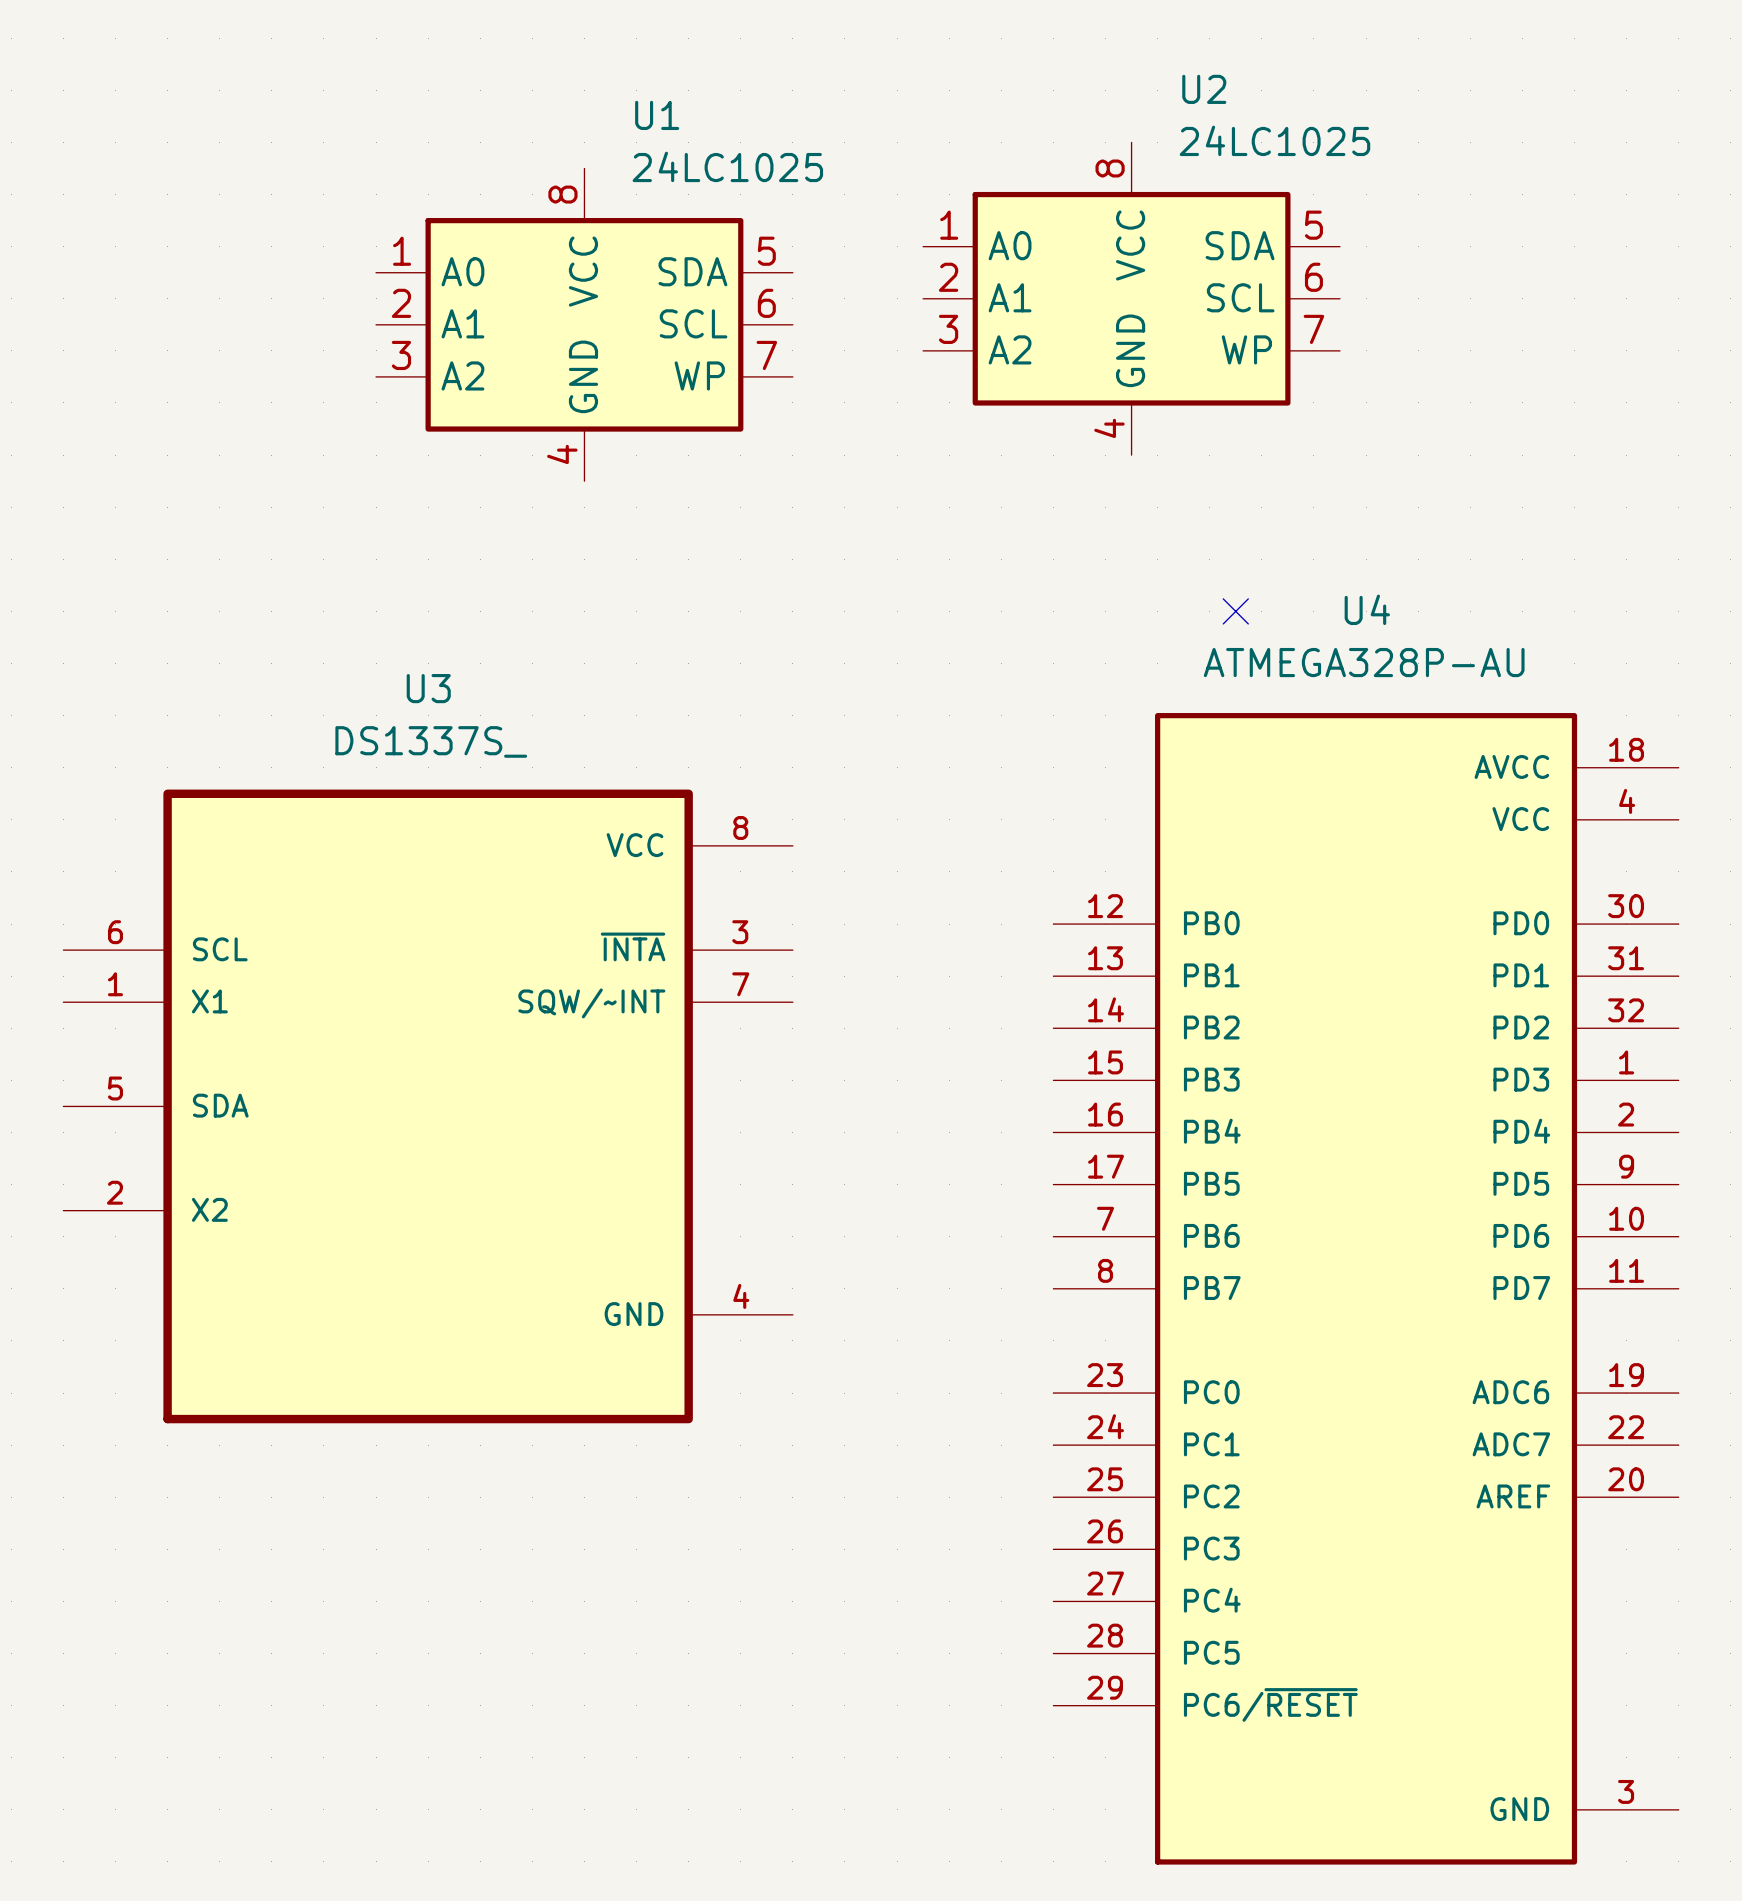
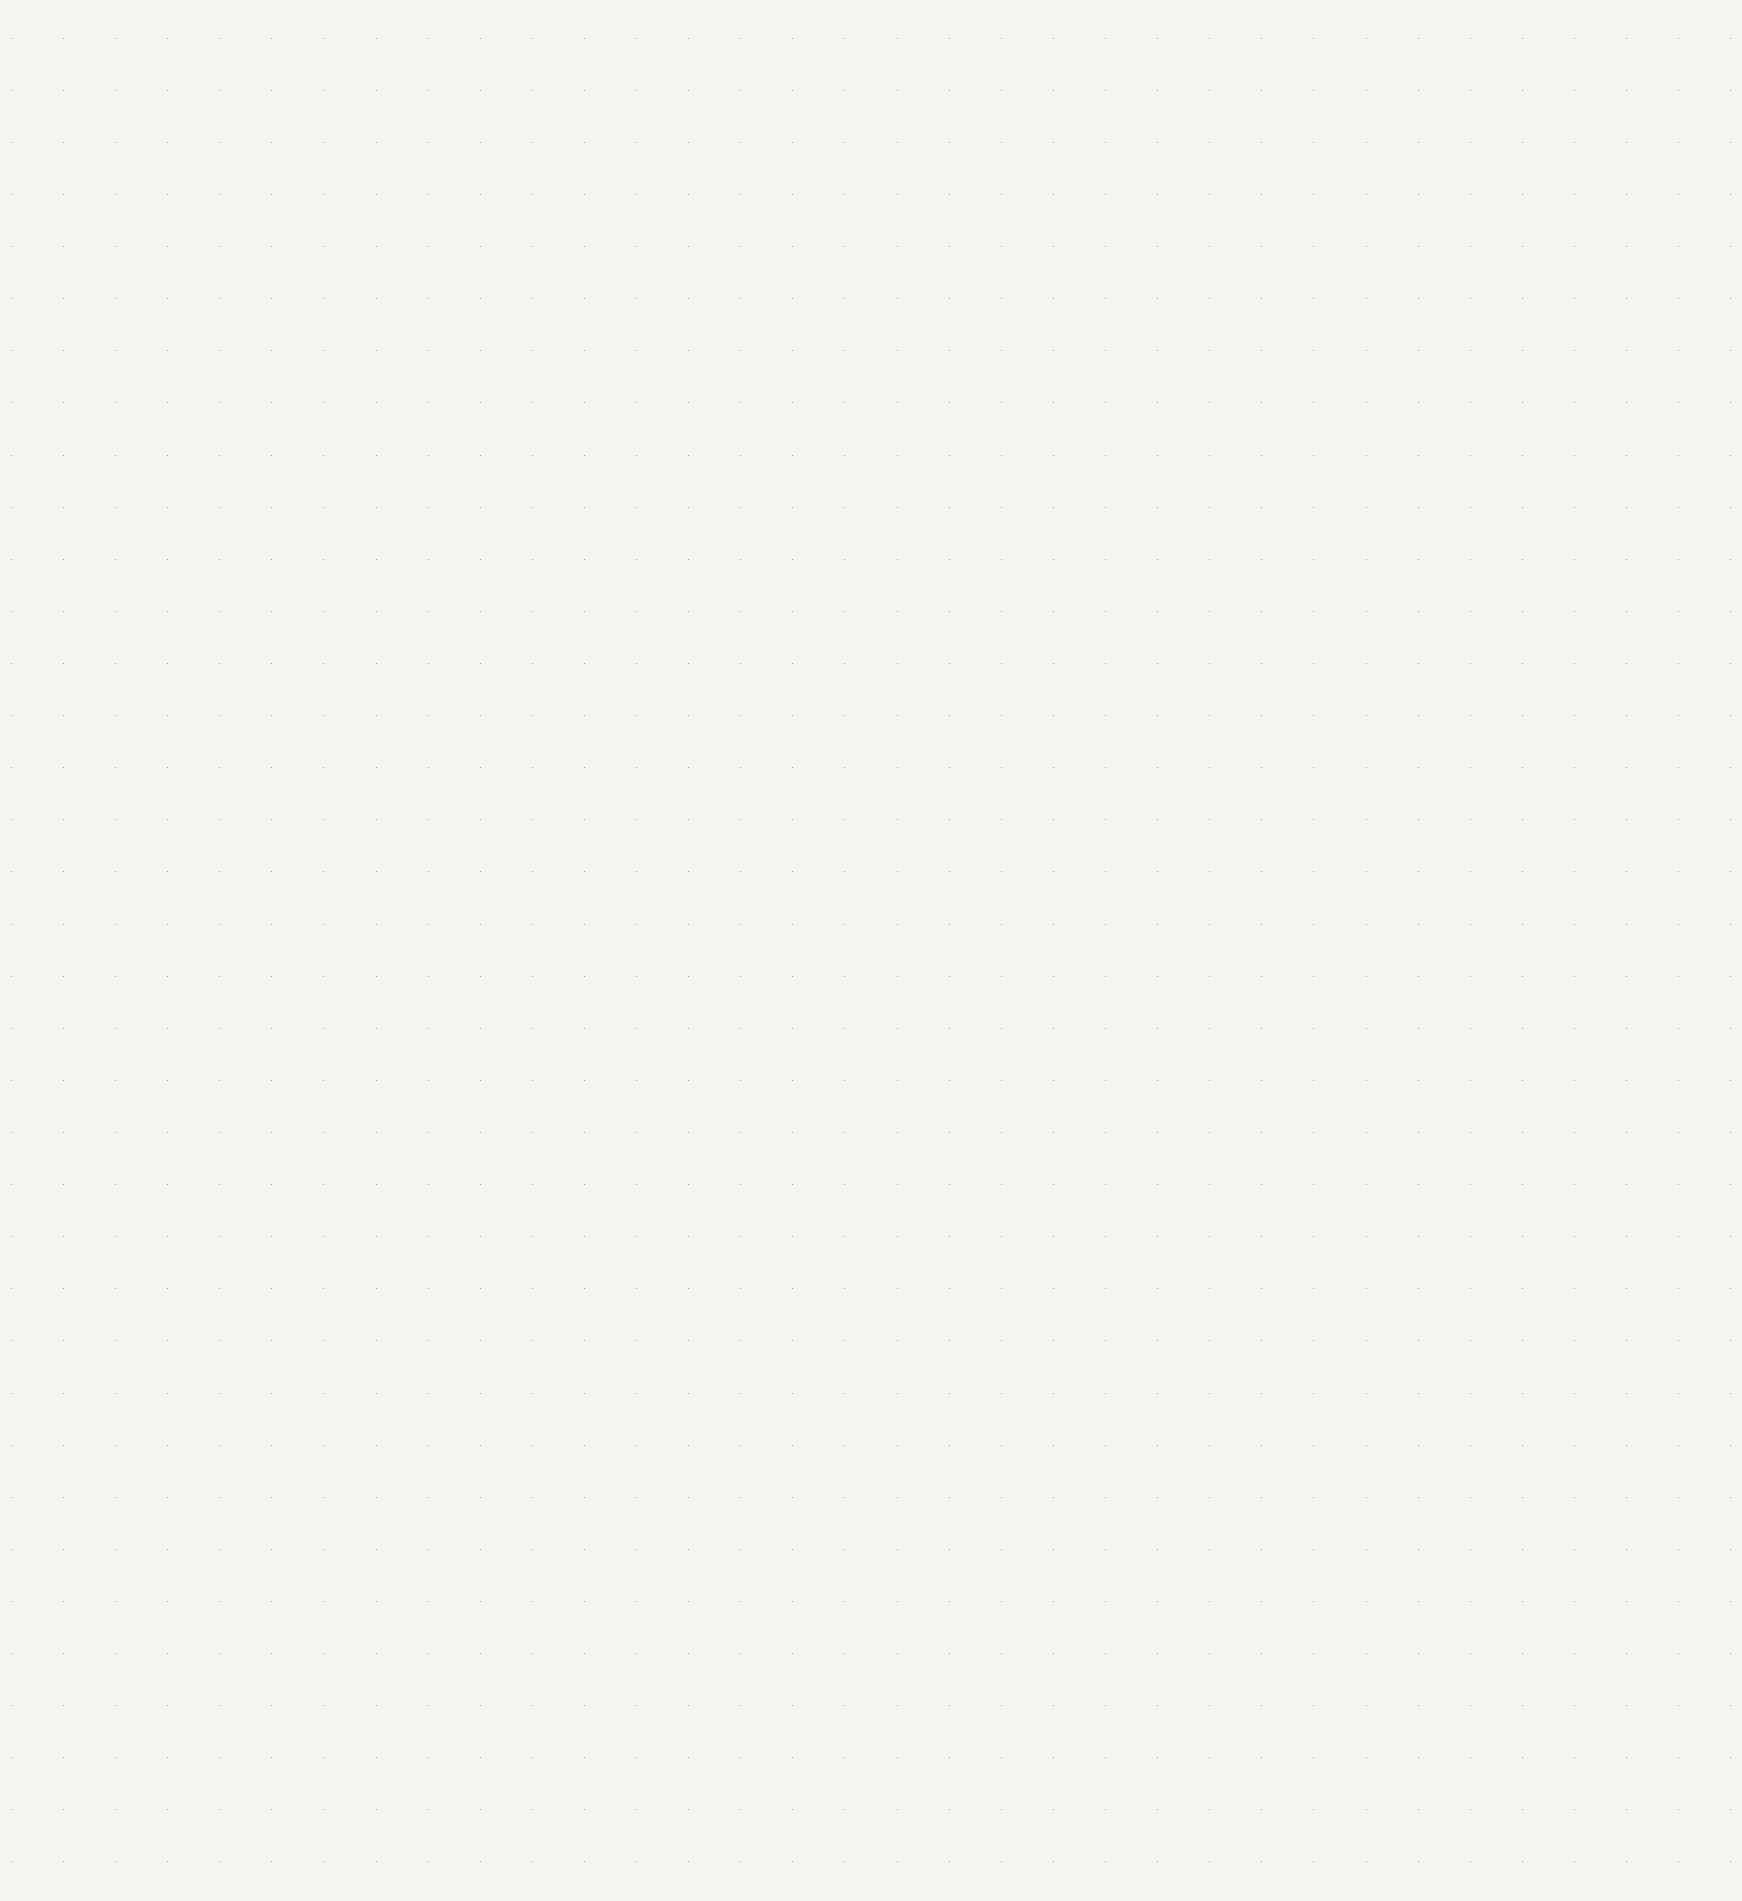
U2: 24LC1025 (1131, 298) -> none
U1: 24LC1025 (584, 324) -> none
no-connect mark: (1235, 611) -> none
U3: DS1337S_ (428, 1106) -> none
U4: ATMEGA328P-AU (1366, 1288) -> none

